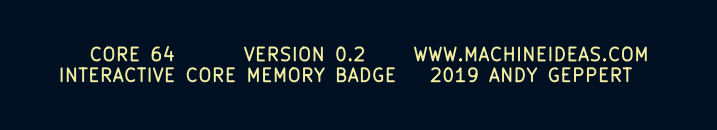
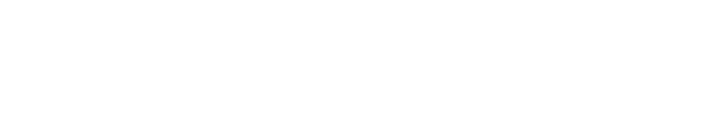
text: CORE 64 VERSION 0.2 (227, 53) -> none
text: WWW.MACHINEIDEAS.COM (530, 53) -> none
text: INTERACTIVE CORE MEMORY BADGE (227, 74) -> none
text: 2019 ANDY GEPPERT (531, 74) -> none

